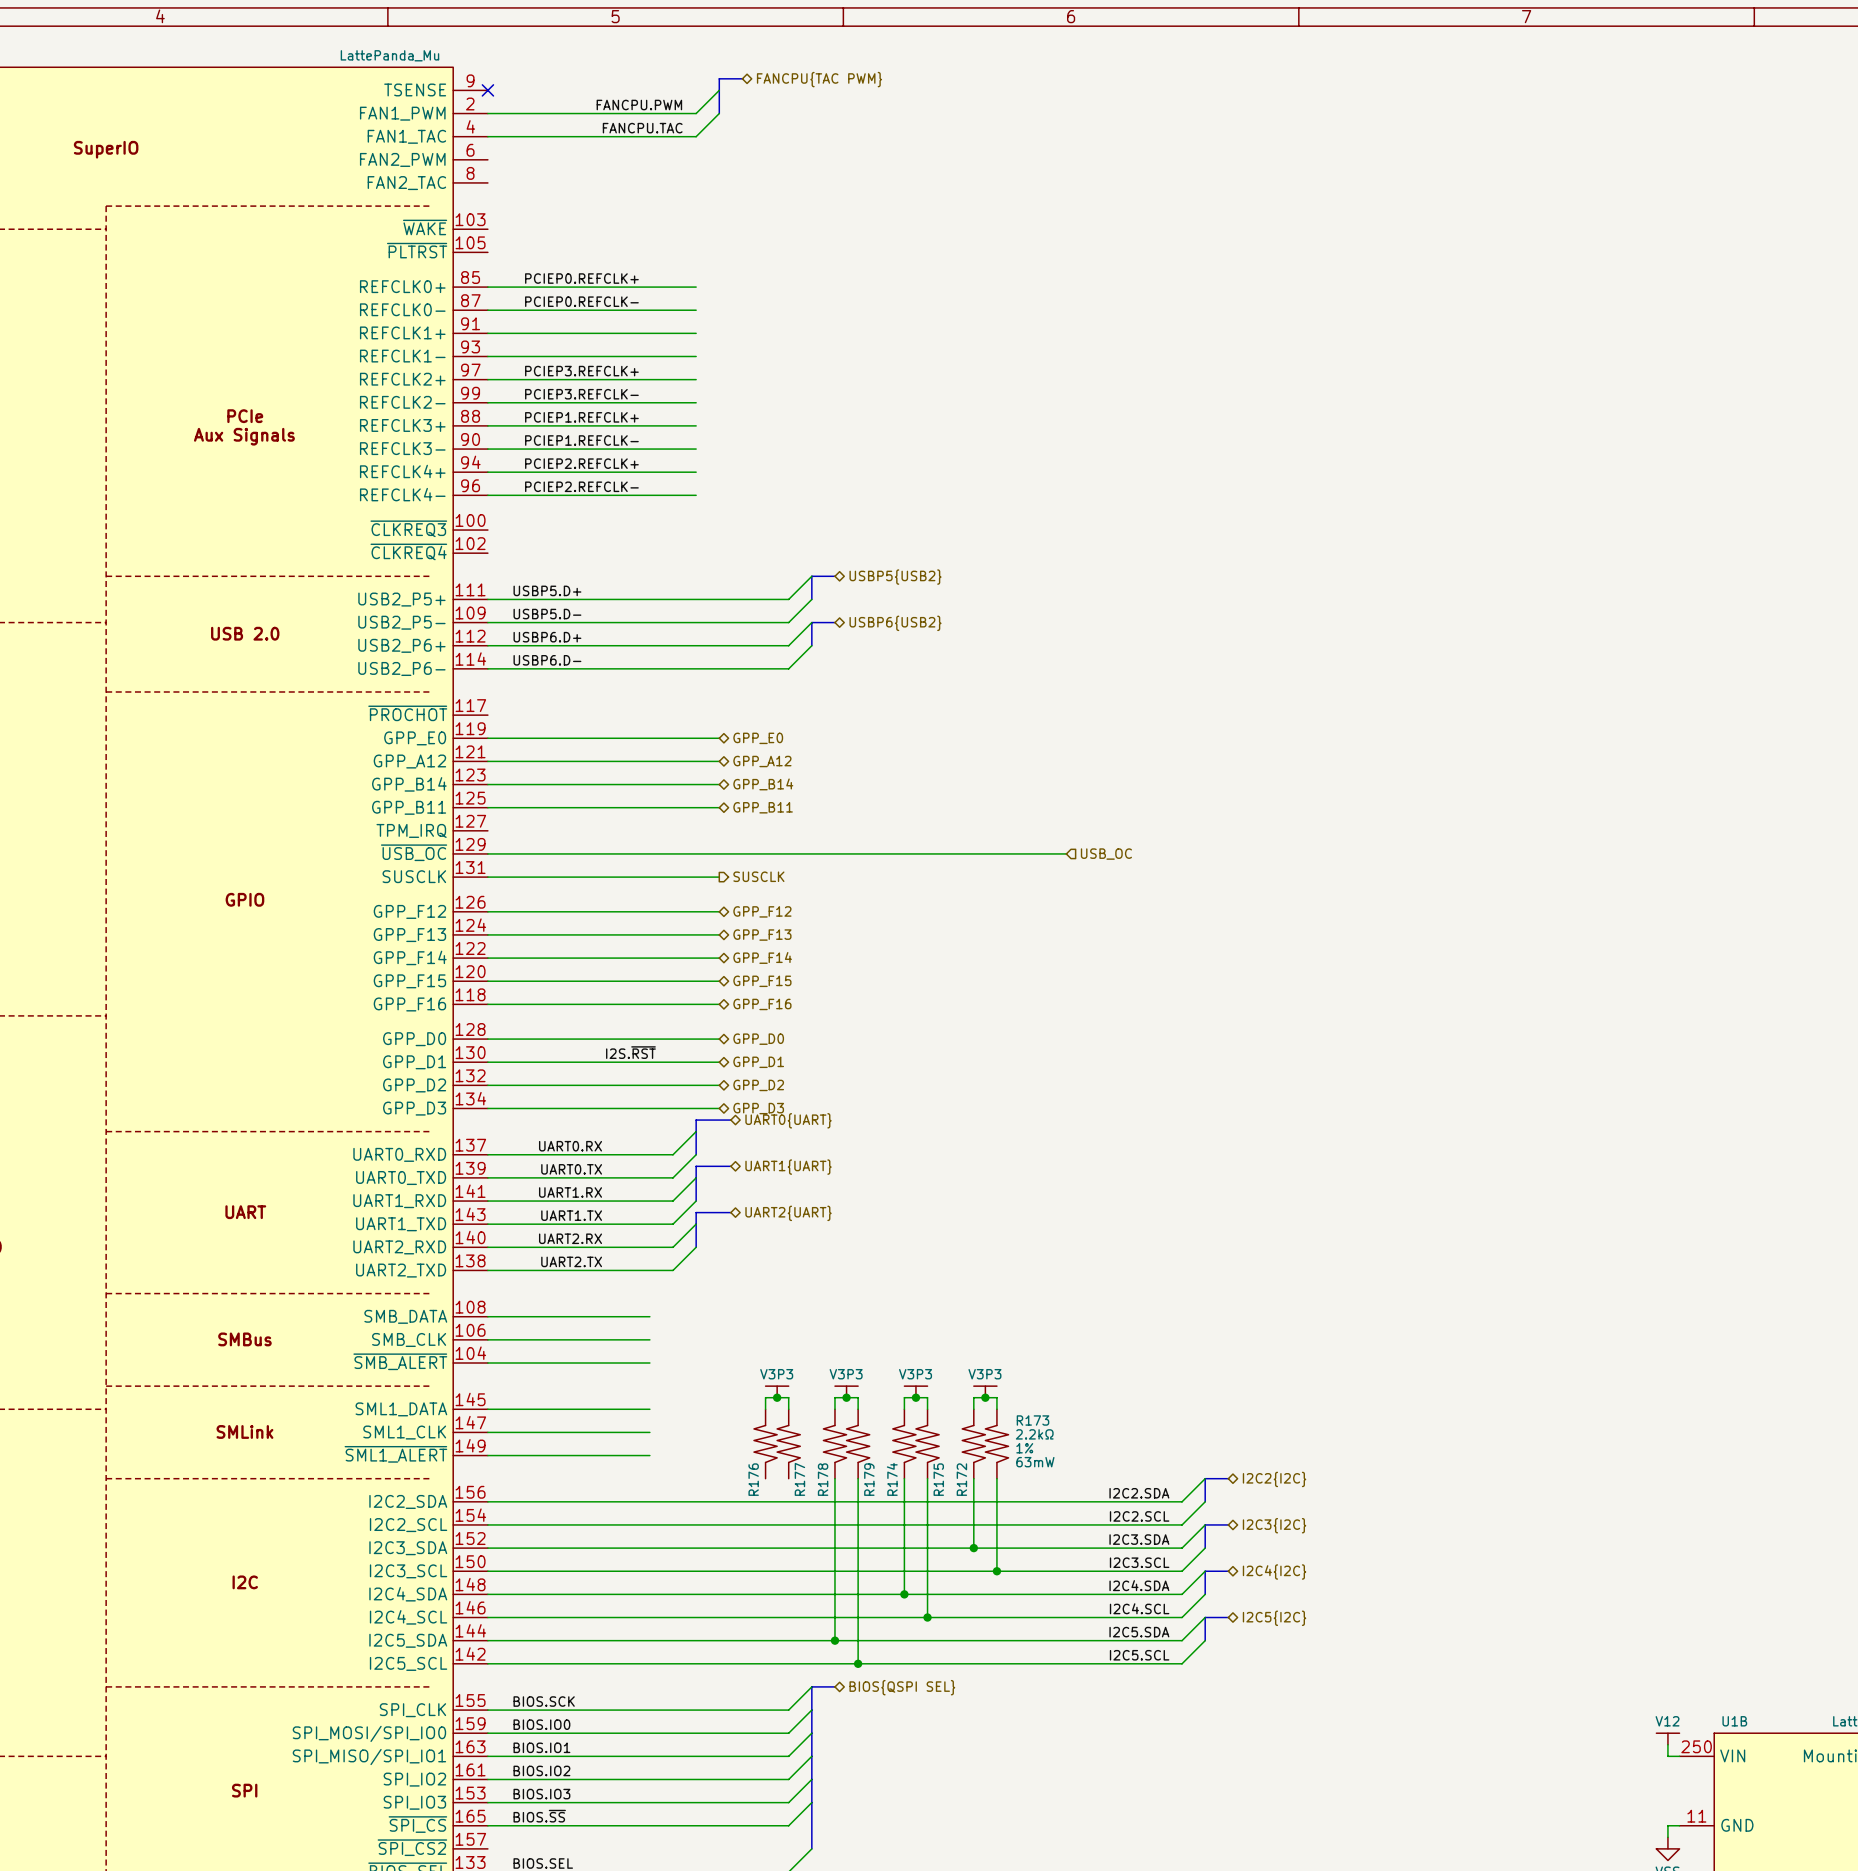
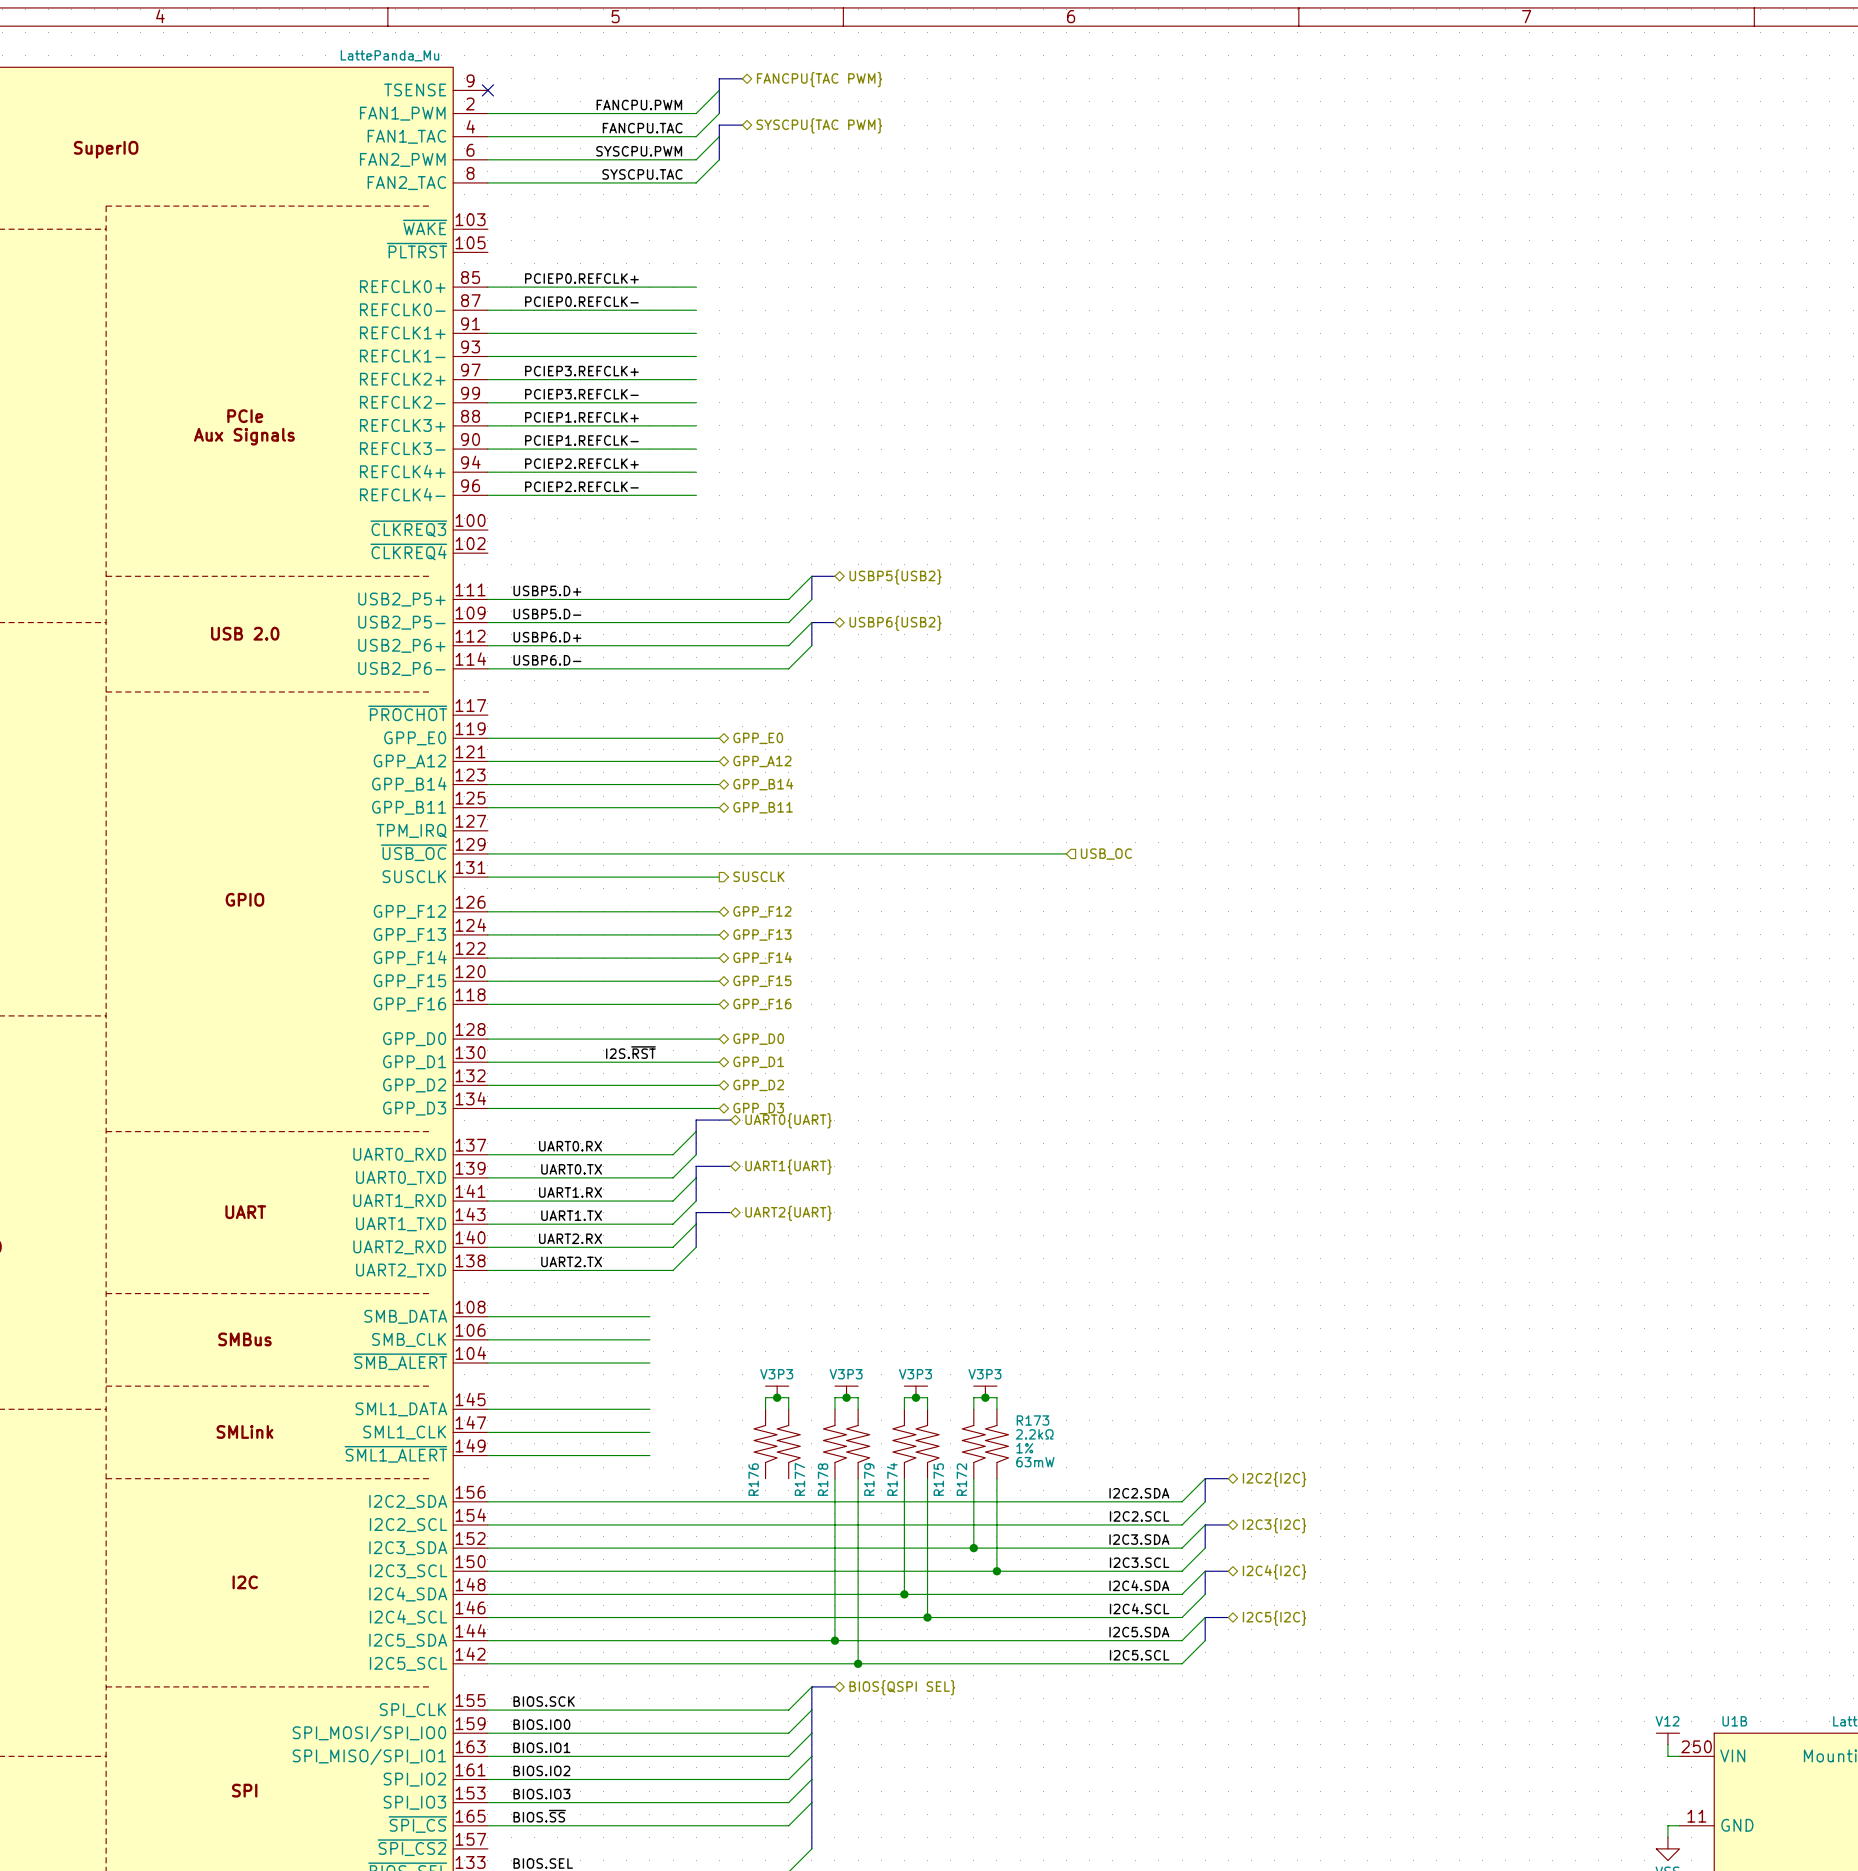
bus: none -> (742, 125) (719, 125) (719, 159)
hierarchical label: none -> SYSCPU{TAC PWM} (819, 125)
wire: none -> (719, 136) (696, 159) (487, 159)
label: none -> SYSCPU.PWM (639, 151)
wire: none -> (719, 159) (696, 182) (487, 182)
label: none -> SYSCPU.TAC (642, 174)

